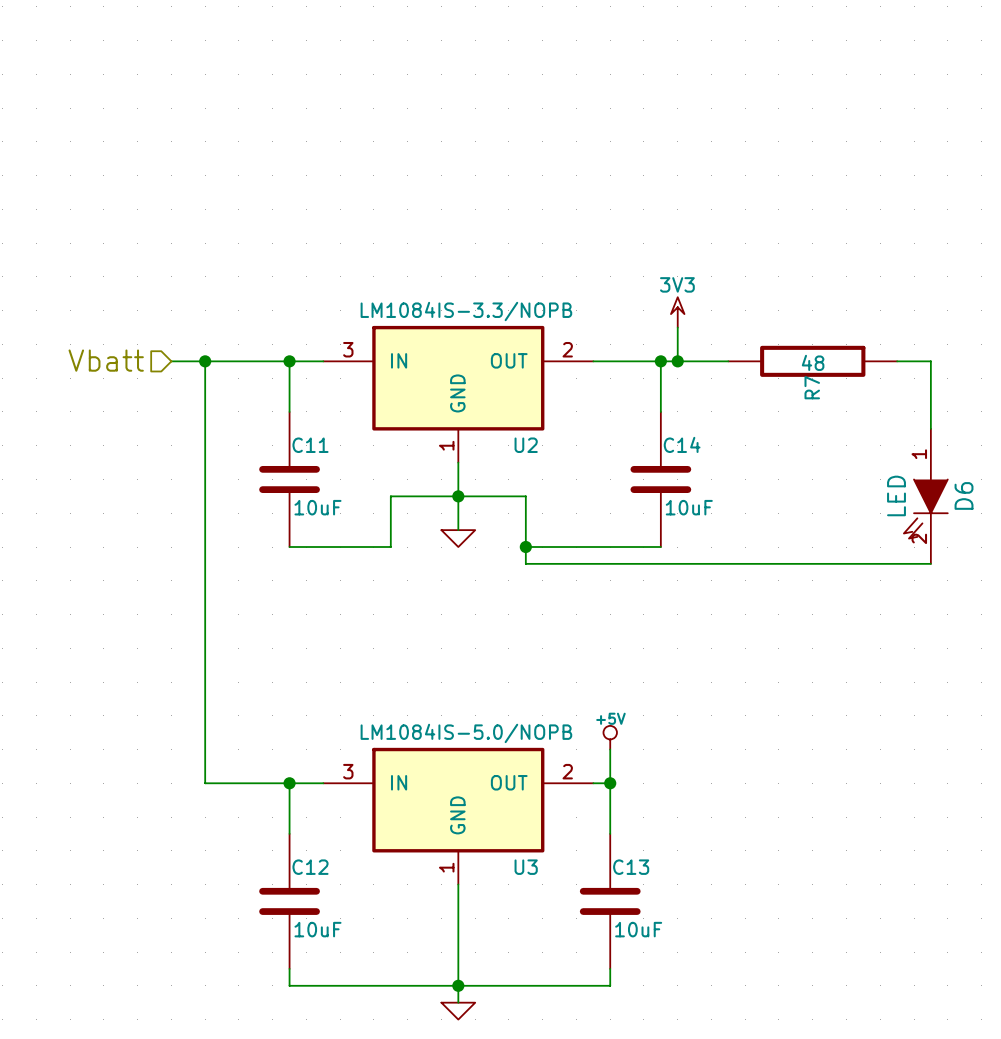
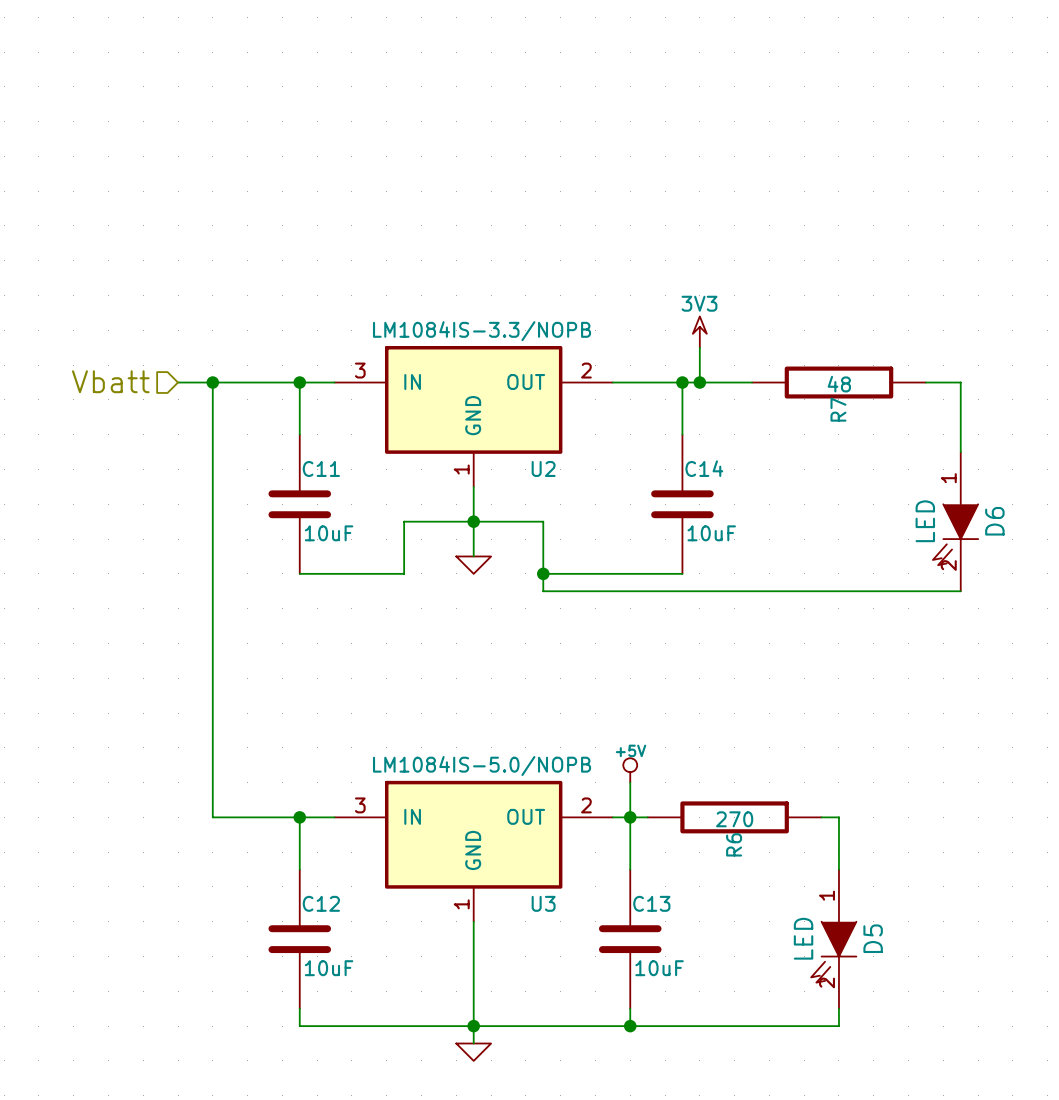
wire: none -> (630, 817) (647, 817)
R6: none -> 270 (734, 817)
wire: none -> (821, 817) (838, 817) (838, 869)
D5: none -> LED (833, 939)
wire: none -> (838, 1008) (838, 1026) (630, 1026)
junction: none -> (630, 1026)

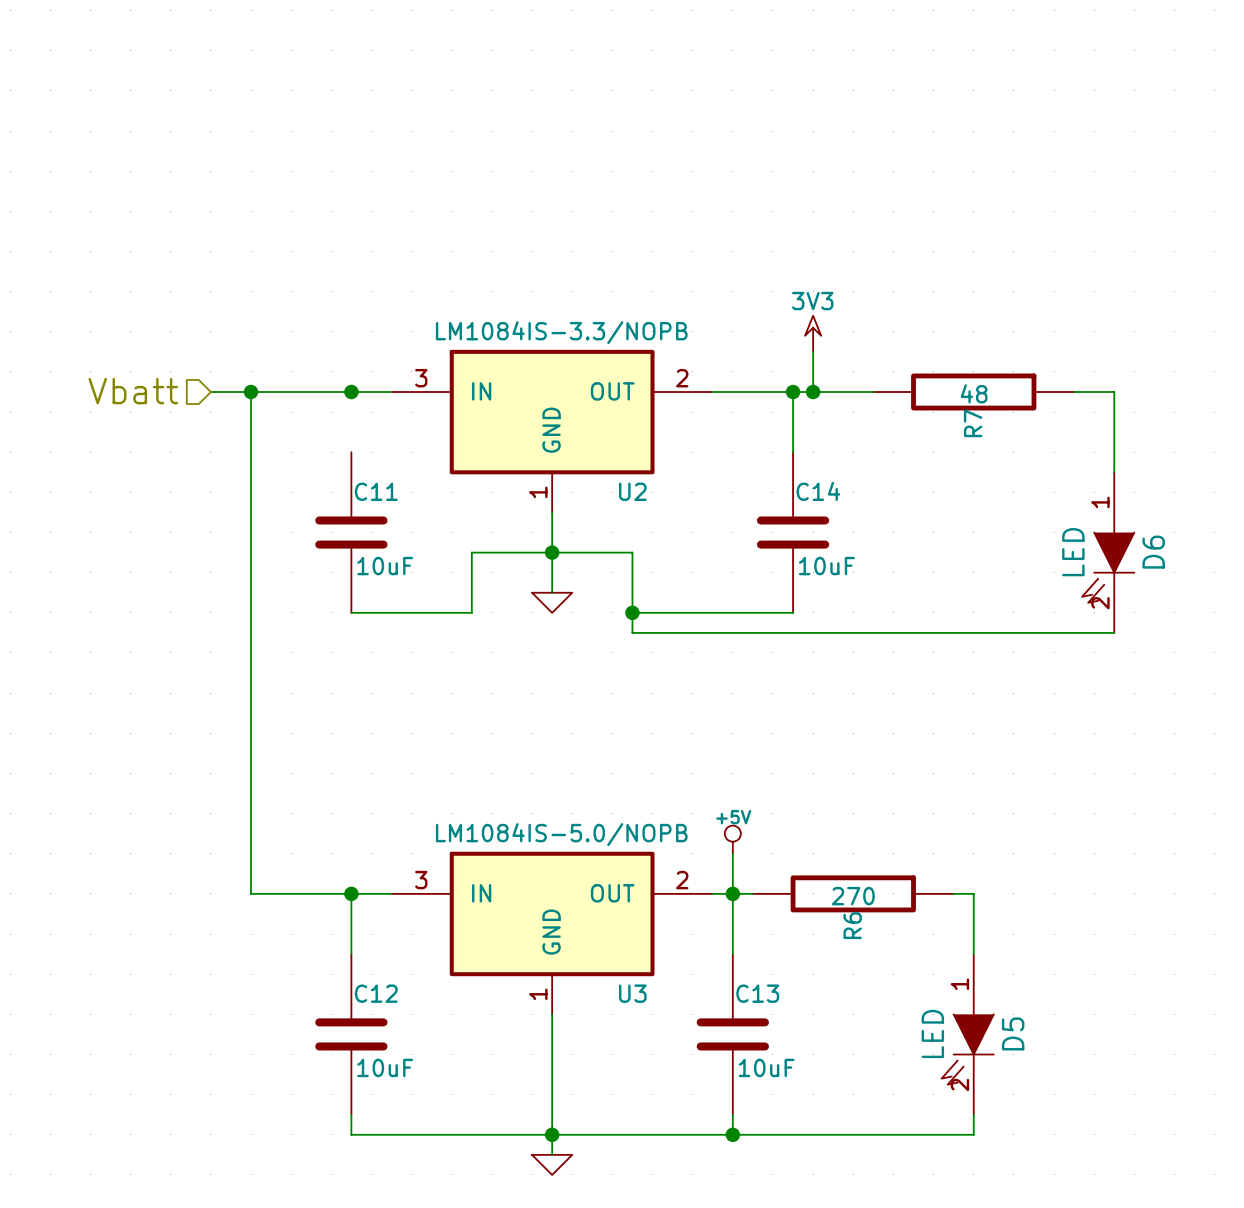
wire: (299, 382) (299, 434) -> none

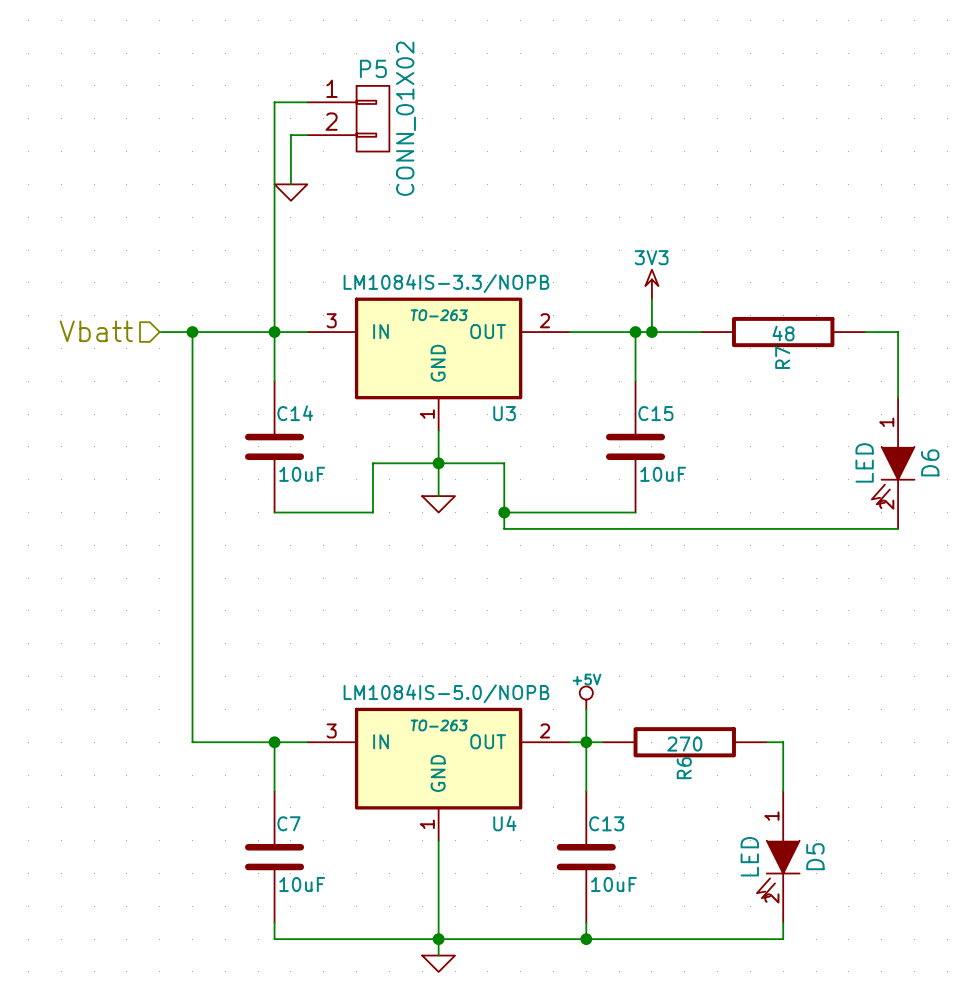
wire: none -> (307, 102) (274, 102) (274, 381)
P5: none -> CONN_01X02 (348, 118)
wire: none -> (307, 135) (290, 135) (290, 184)
power symbol: none -> (290, 192)
U2 text: none -> TO-263 (439, 315)
C11 name: C11 (376, 491) -> C14 (295, 413)
U2 name: U2 (632, 491) -> U3 (504, 413)
C14 name: C14 (818, 491) -> C15 (655, 413)
U3 text: none -> TO-263 (439, 725)
C12 name: C12 (376, 993) -> C7 (288, 823)
U3 name: U3 (632, 993) -> U4 (504, 823)

